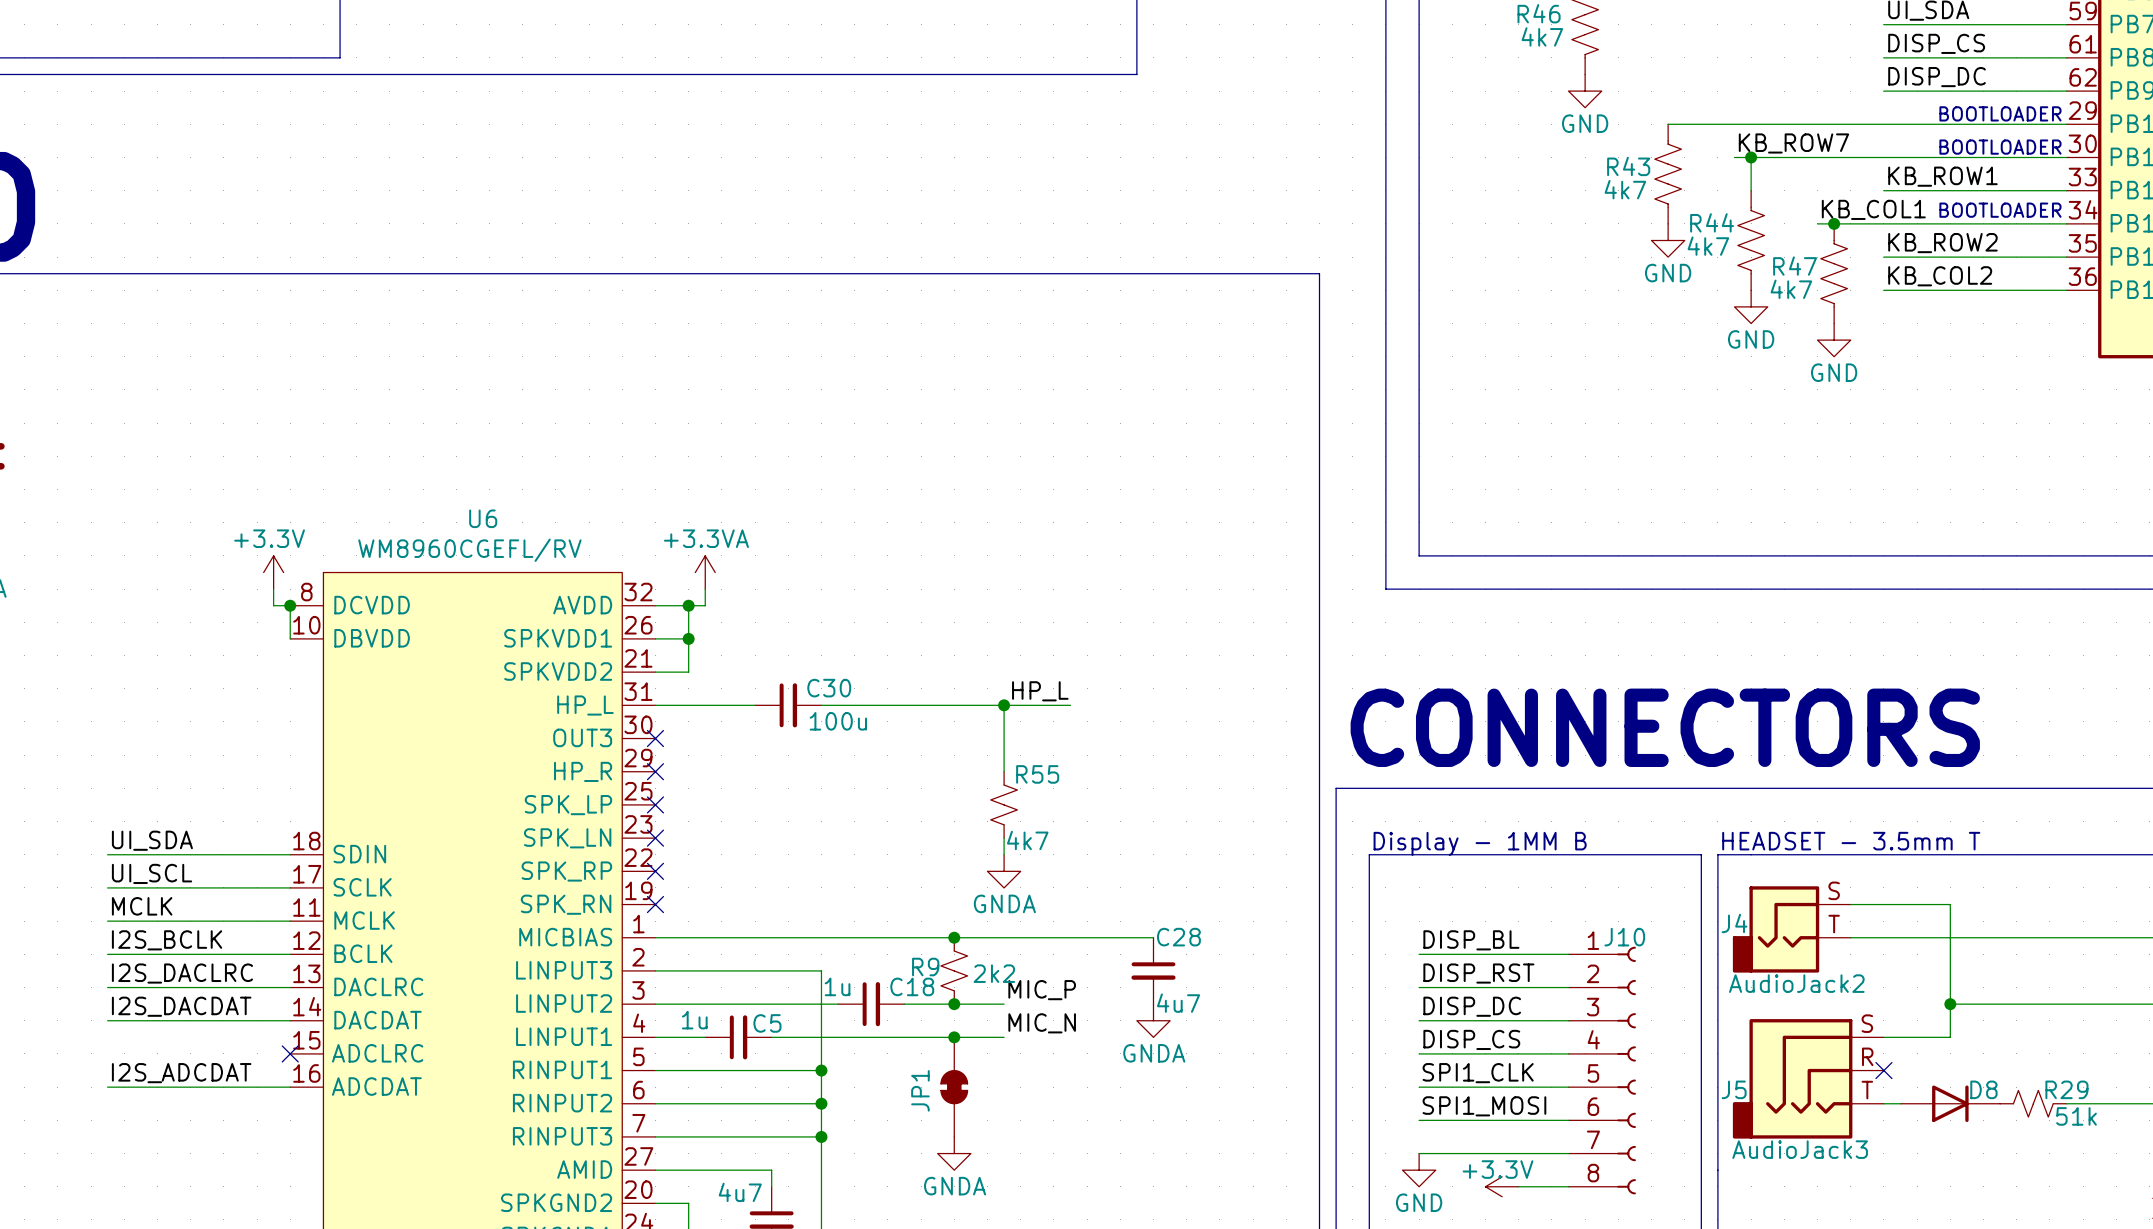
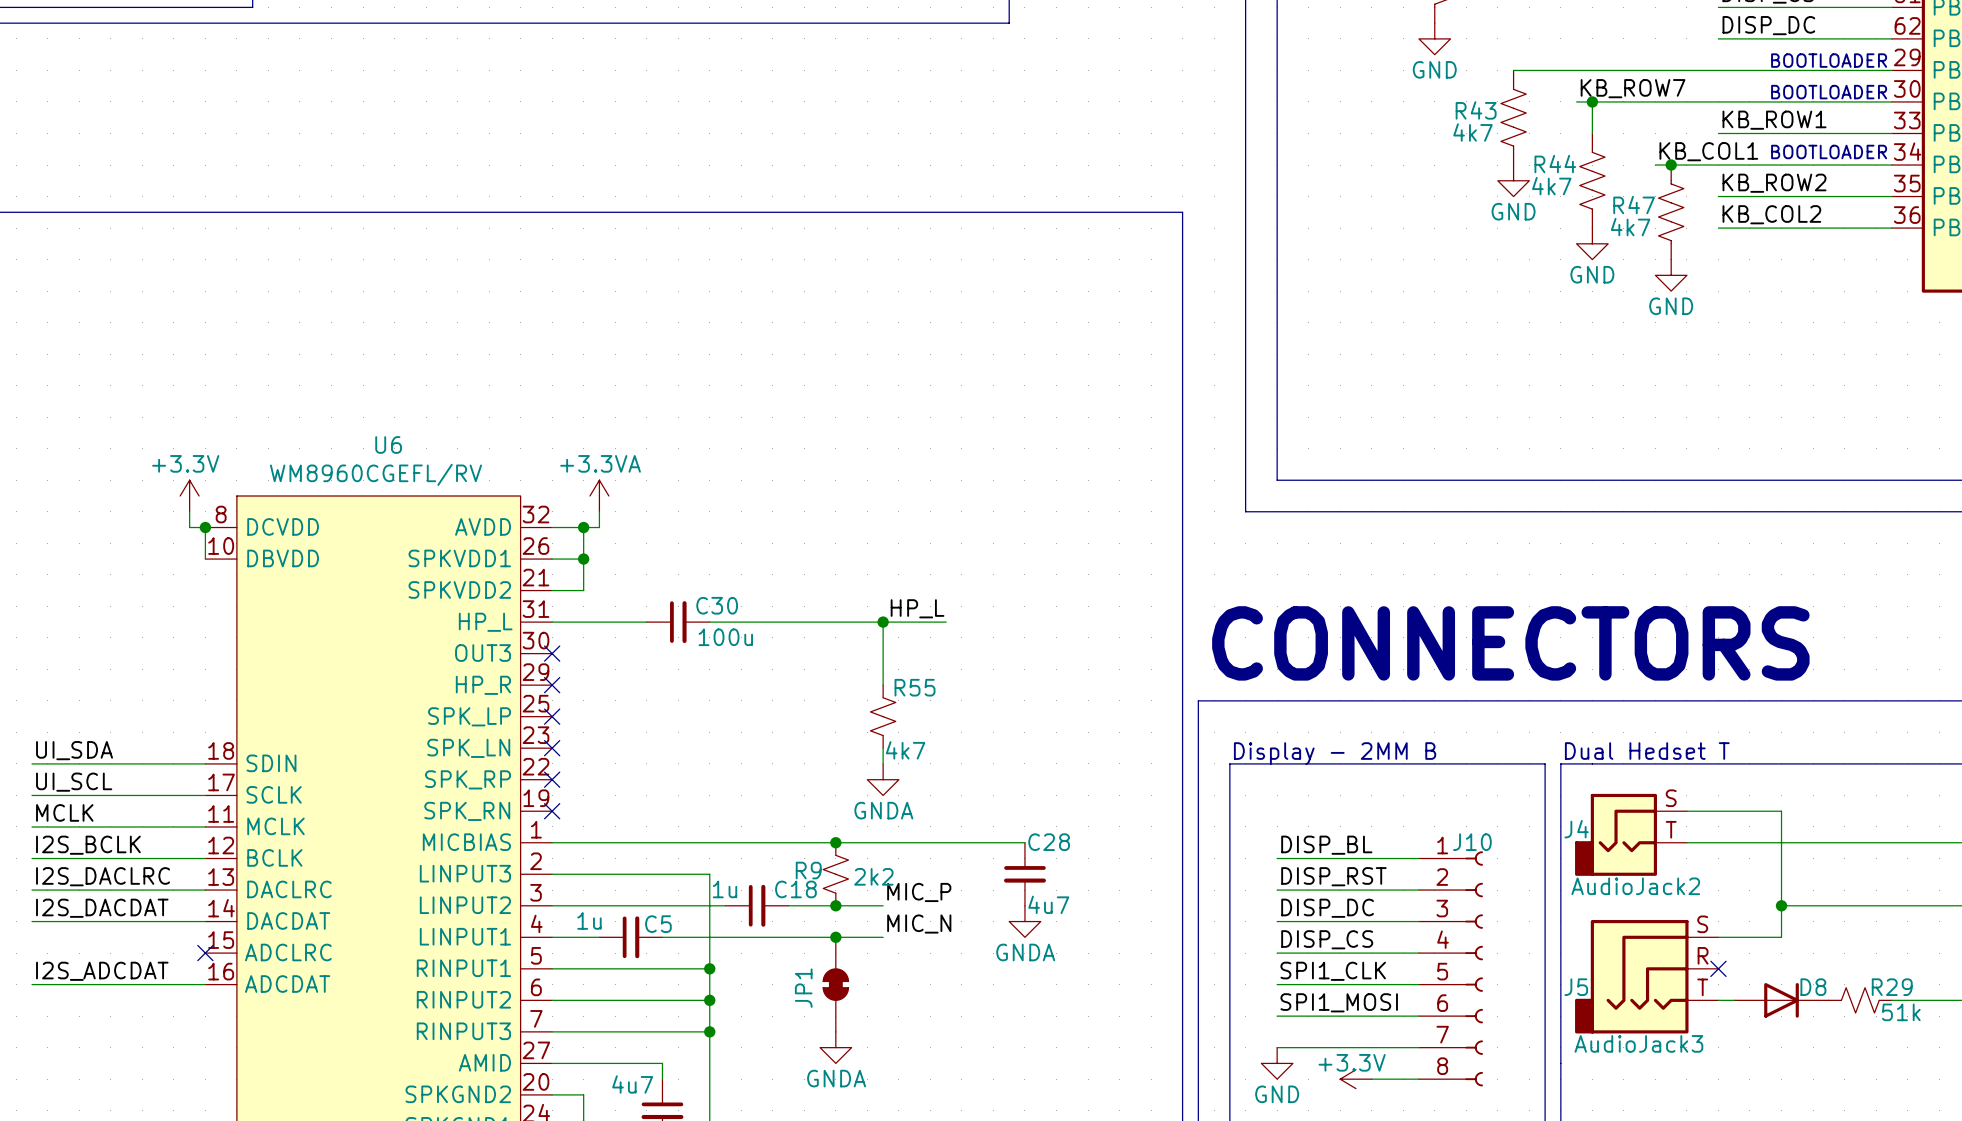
text: HEADSET - 3.5mm T (1851, 841) -> Dual Hedset T (1647, 751)
text: Display - 1MM B (1480, 843) -> Display - 2MM B (1335, 753)

